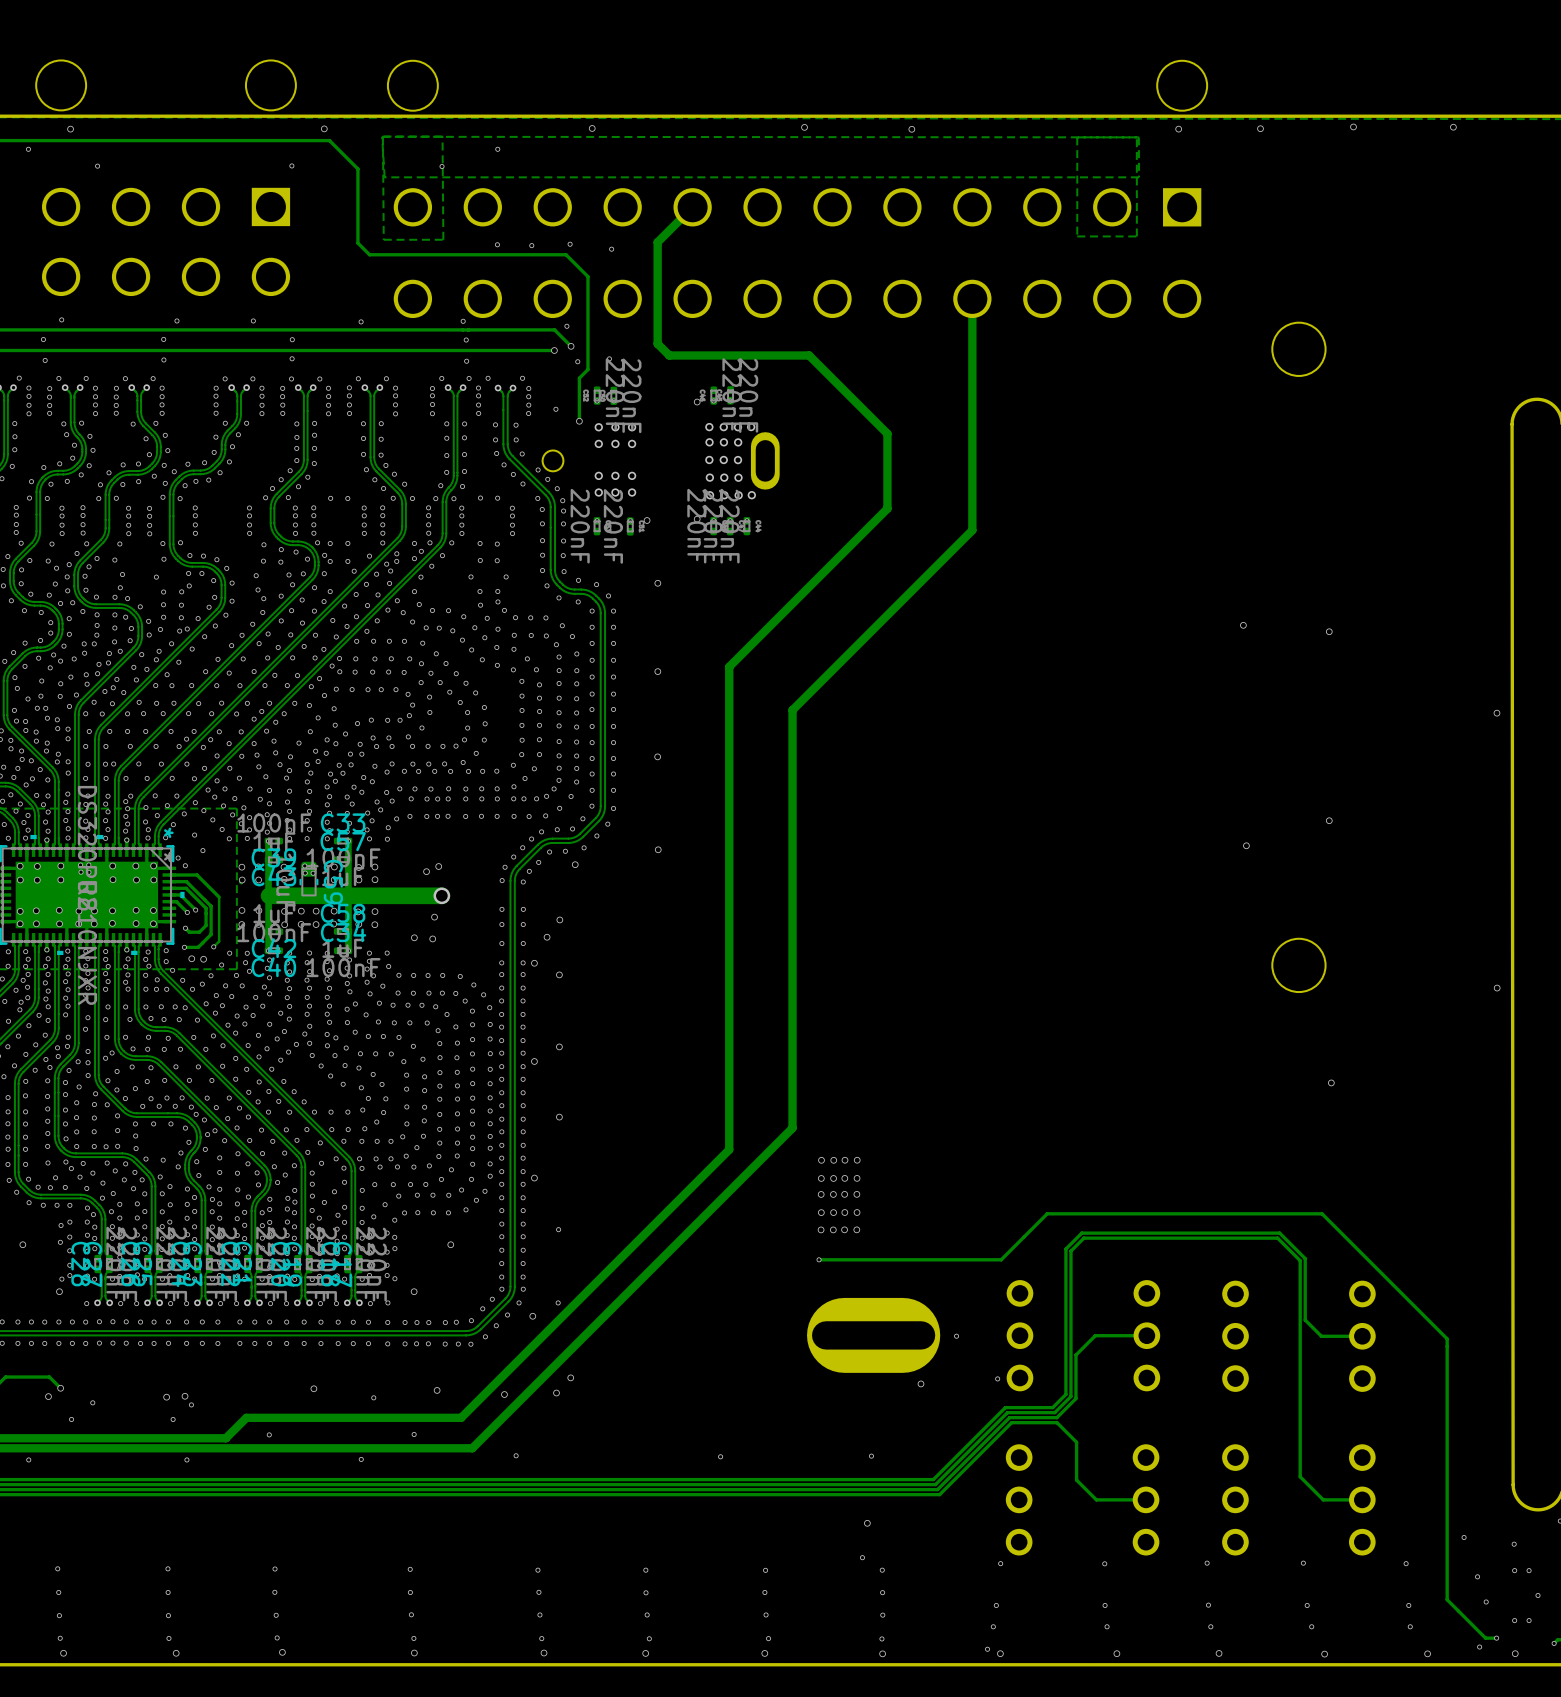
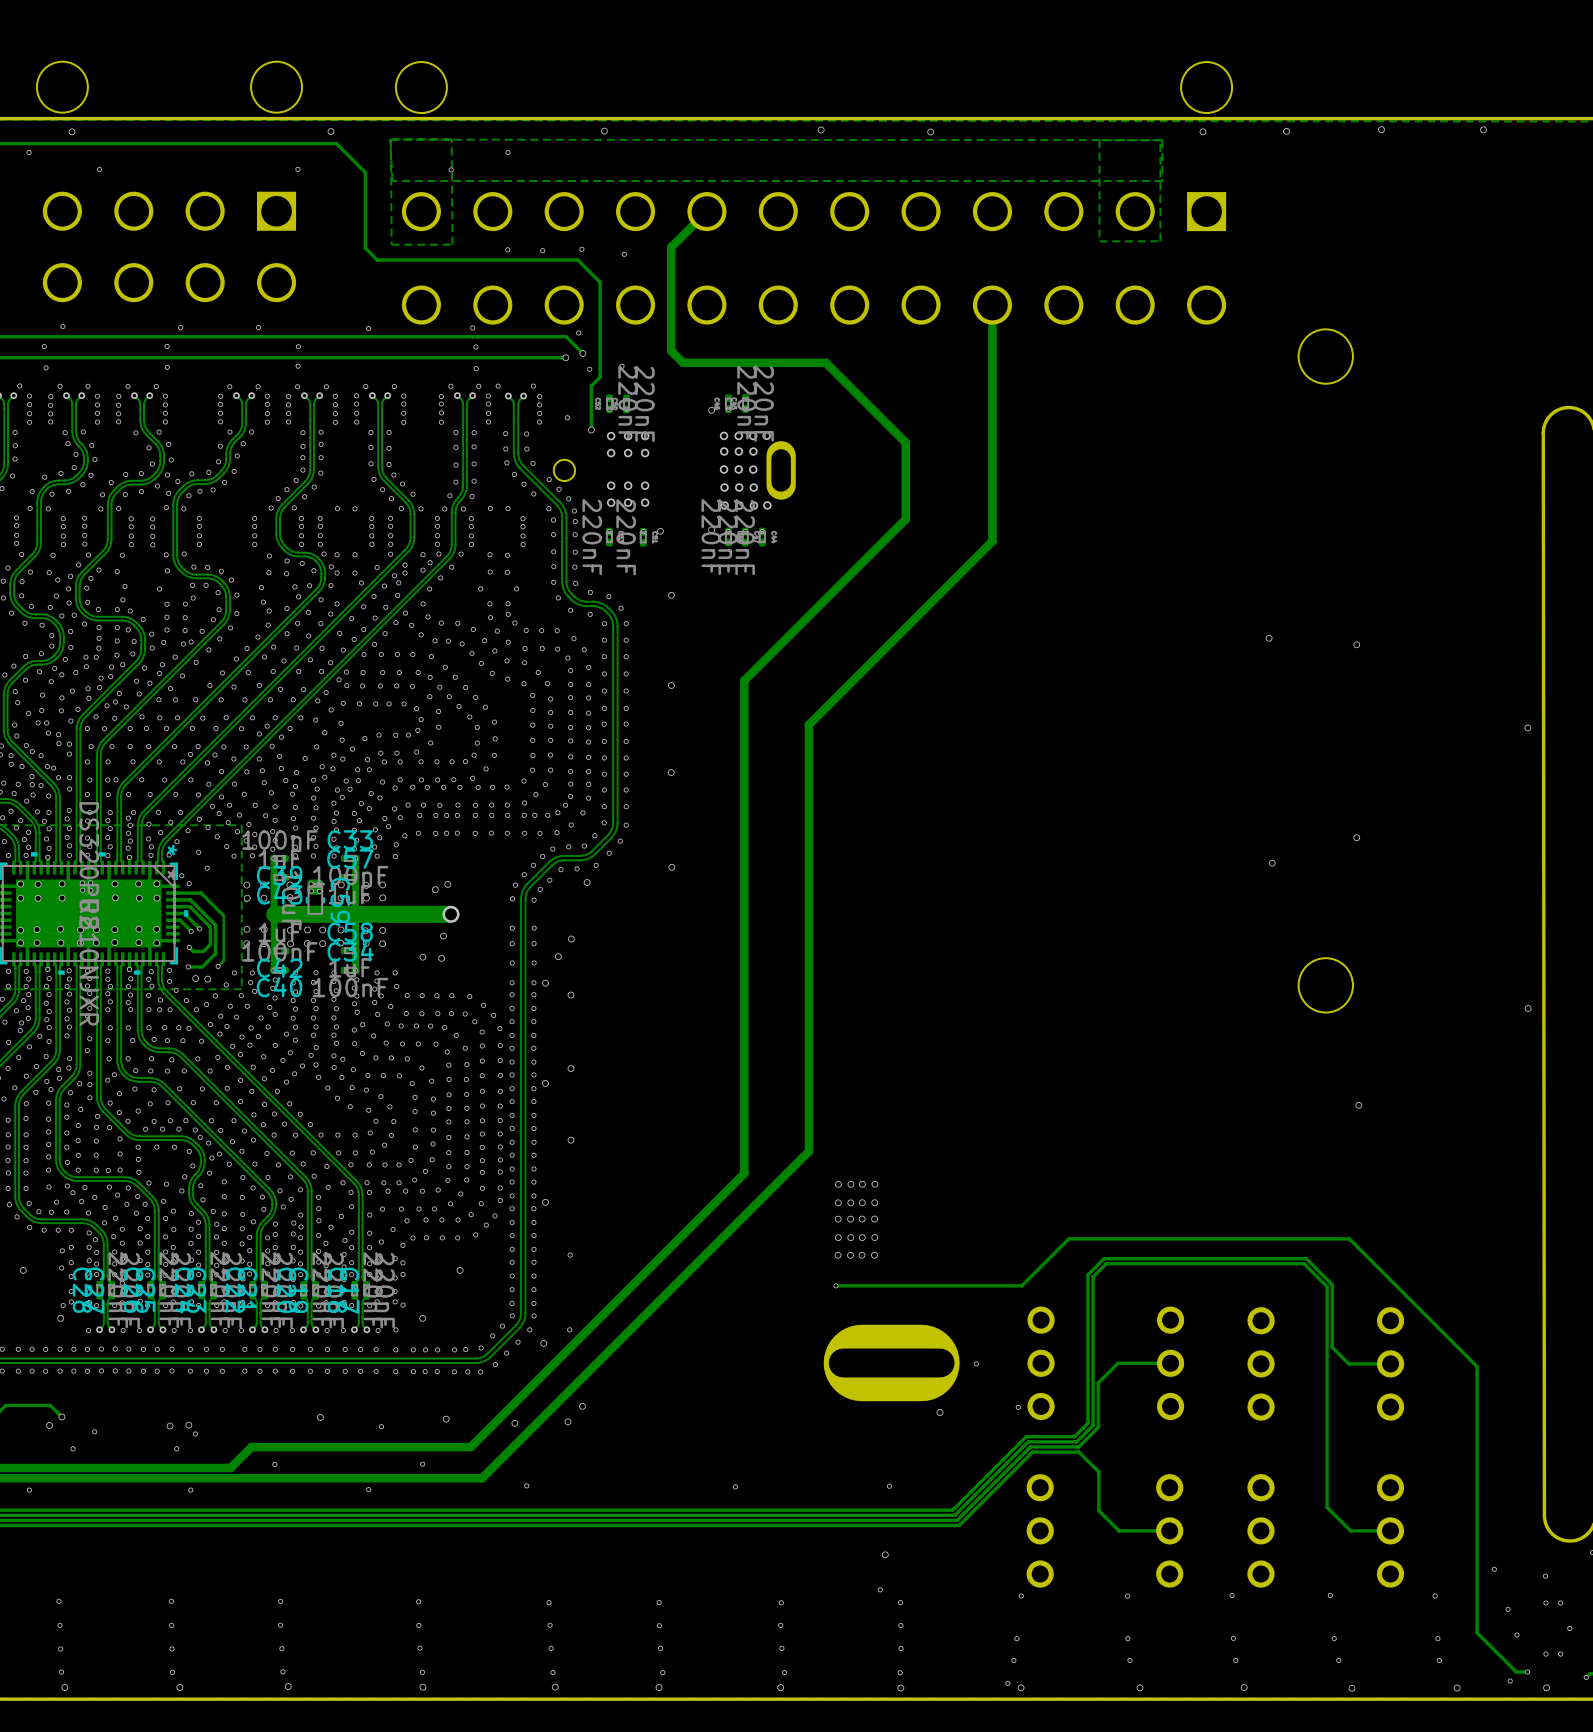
via: (25, 721) -> none
via: (36, 732) -> none
via: none -> (32, 751)
via: none -> (41, 755)
via: (36, 741) -> none
via: (47, 743) -> none
via: none -> (53, 768)
via: (58, 754) -> none
via: (22, 759) -> none
via: none -> (32, 784)

